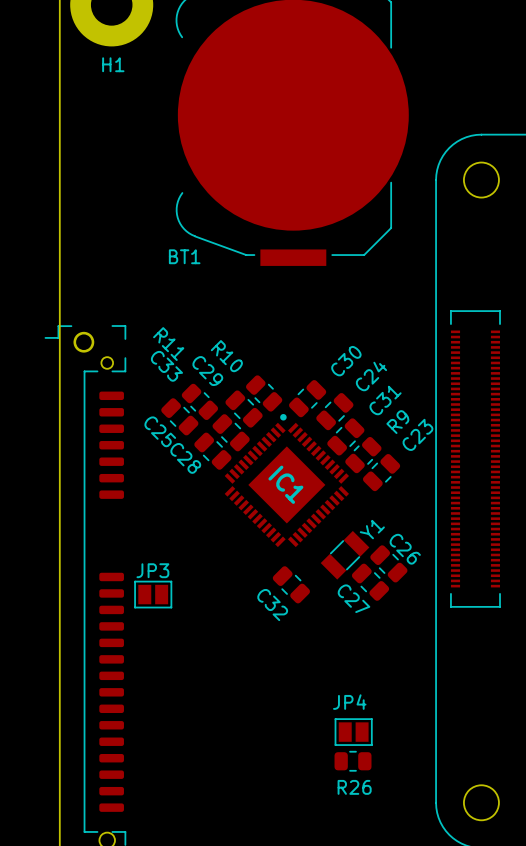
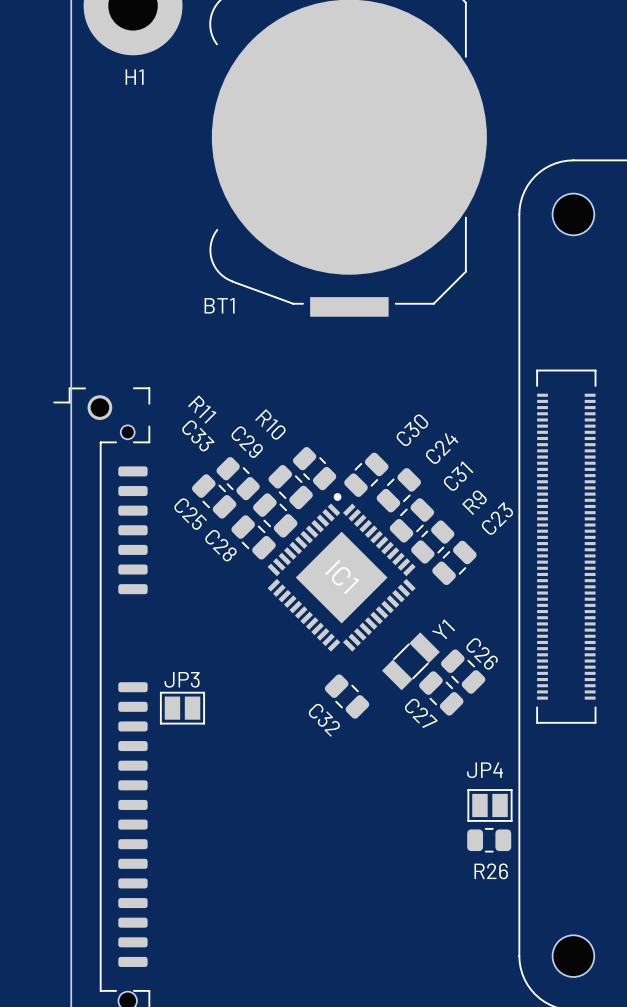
JP4 position: (353, 732) -> (489, 805)
R26 position: (353, 761) -> (489, 840)

